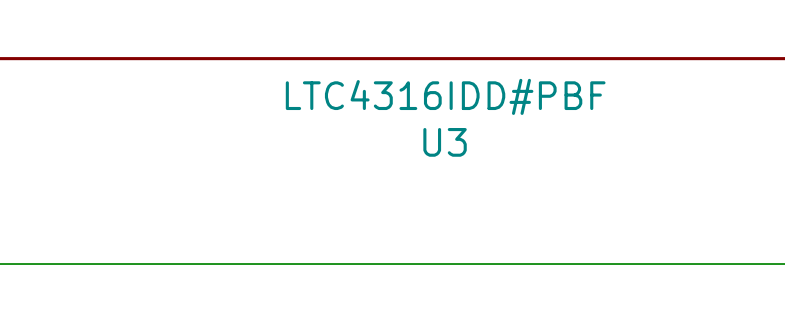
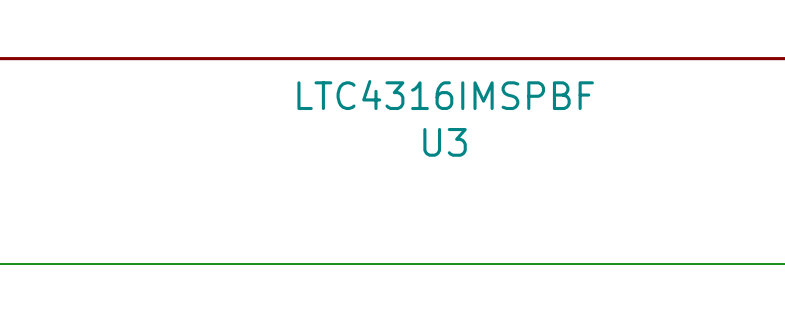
U3 value: LTC4316IDD#PBF (445, 96) -> LTC4316IMSPBF (445, 95)

